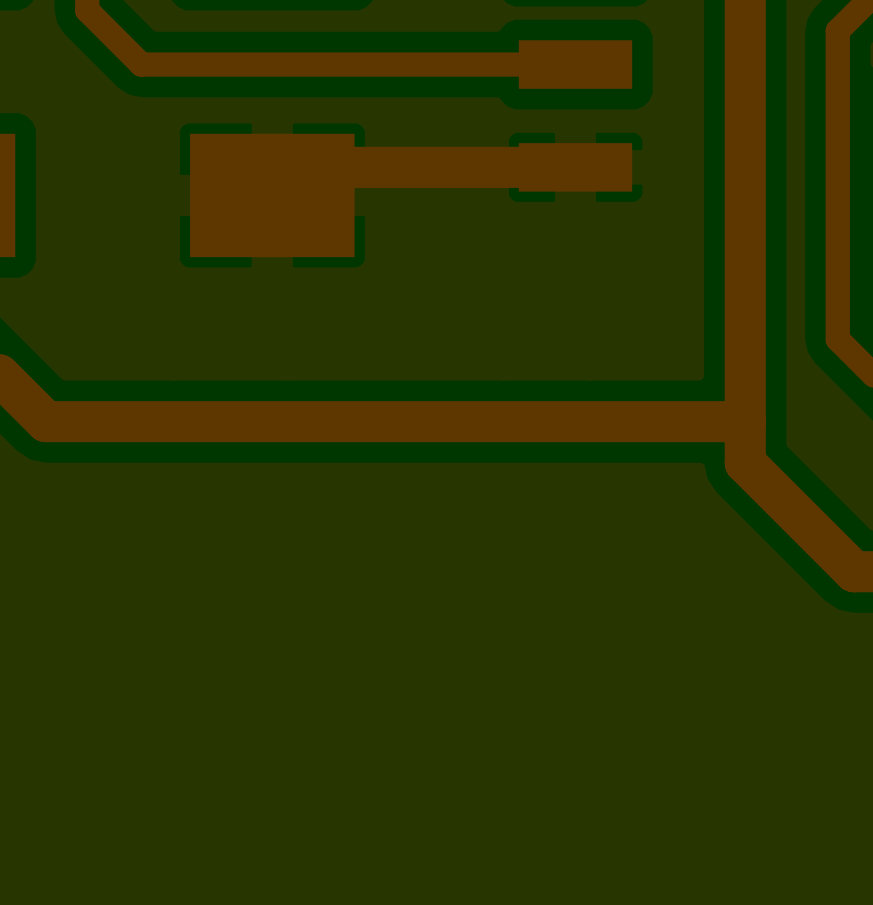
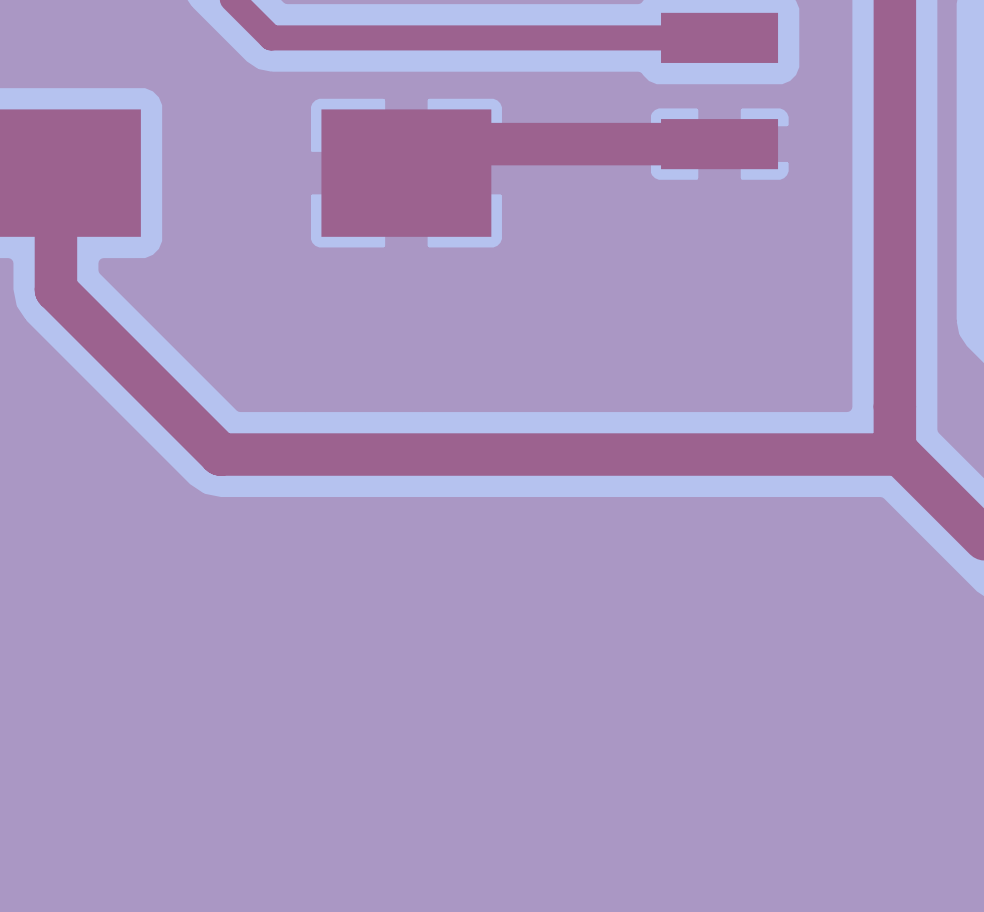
top track: (745, 421) (46, 421) -> (900, 454) (220, 454) (172, 406)

